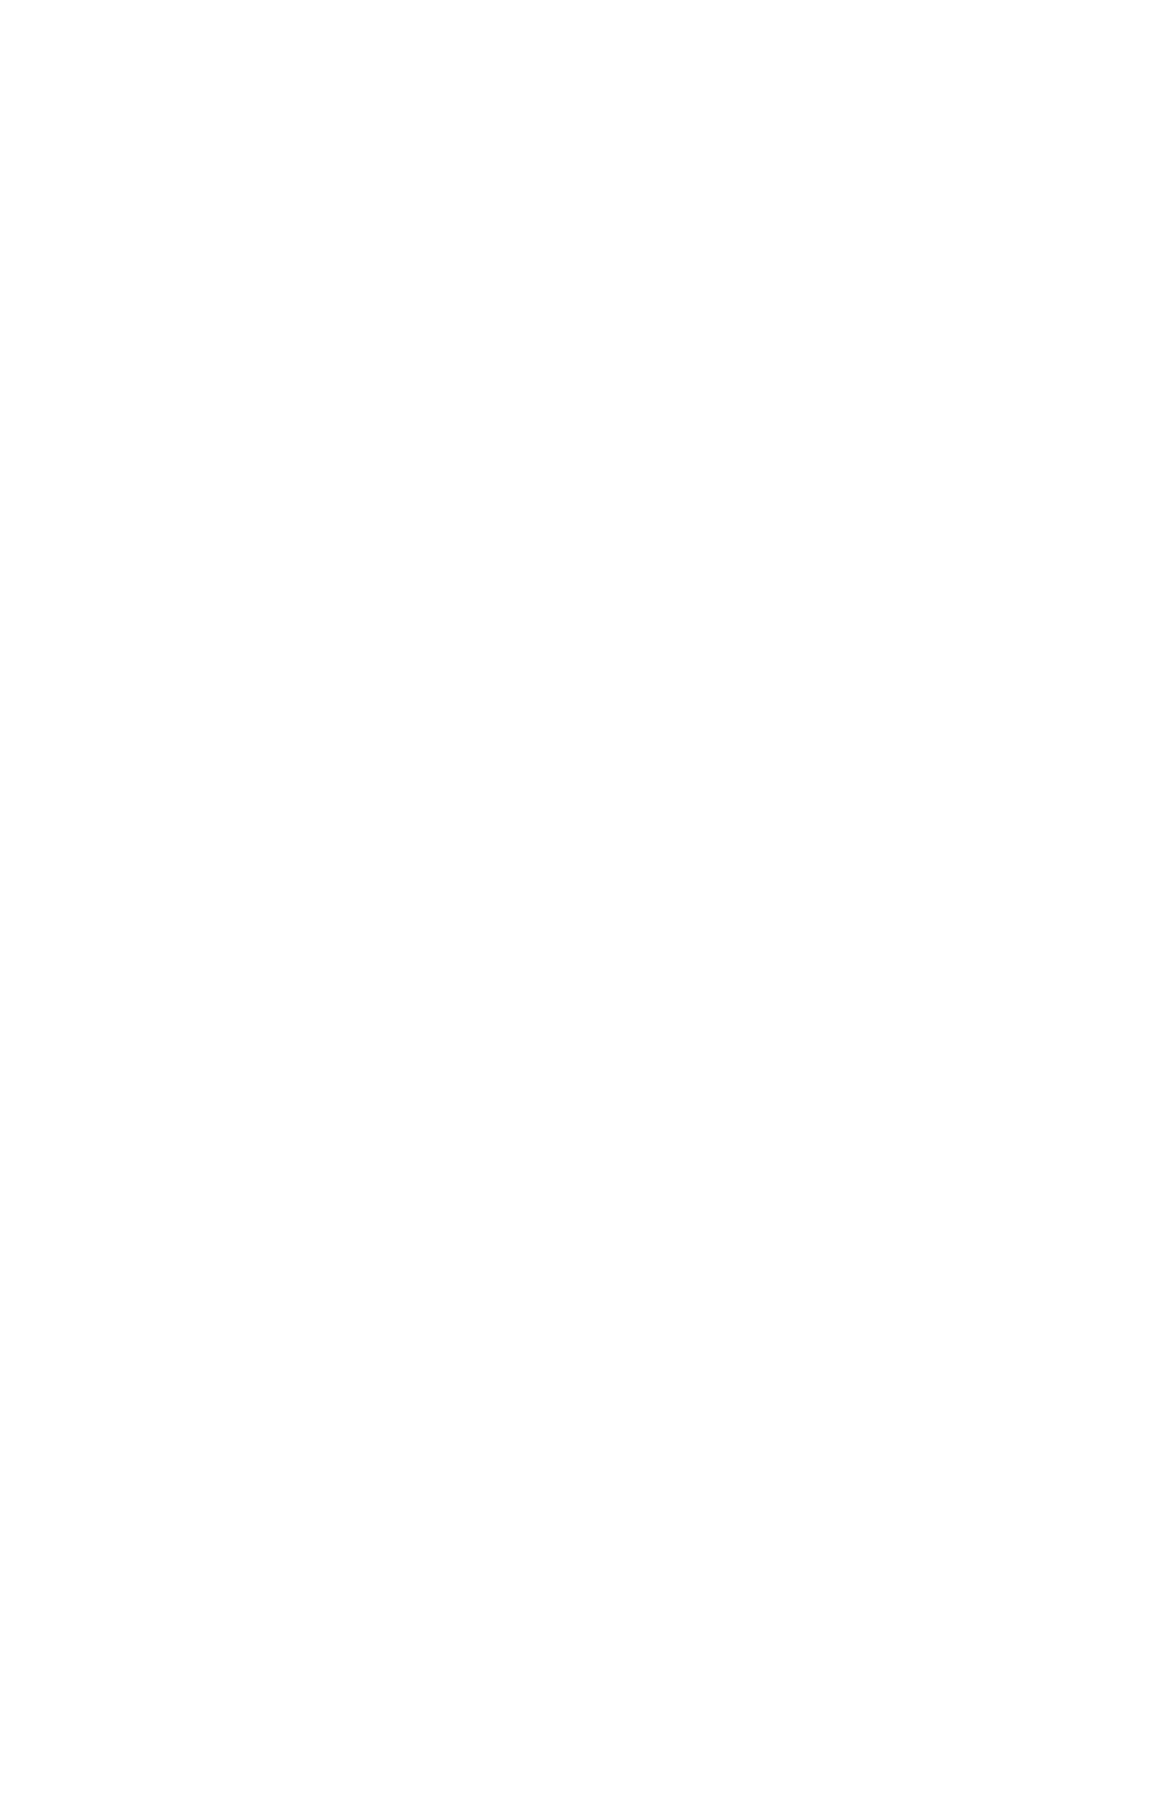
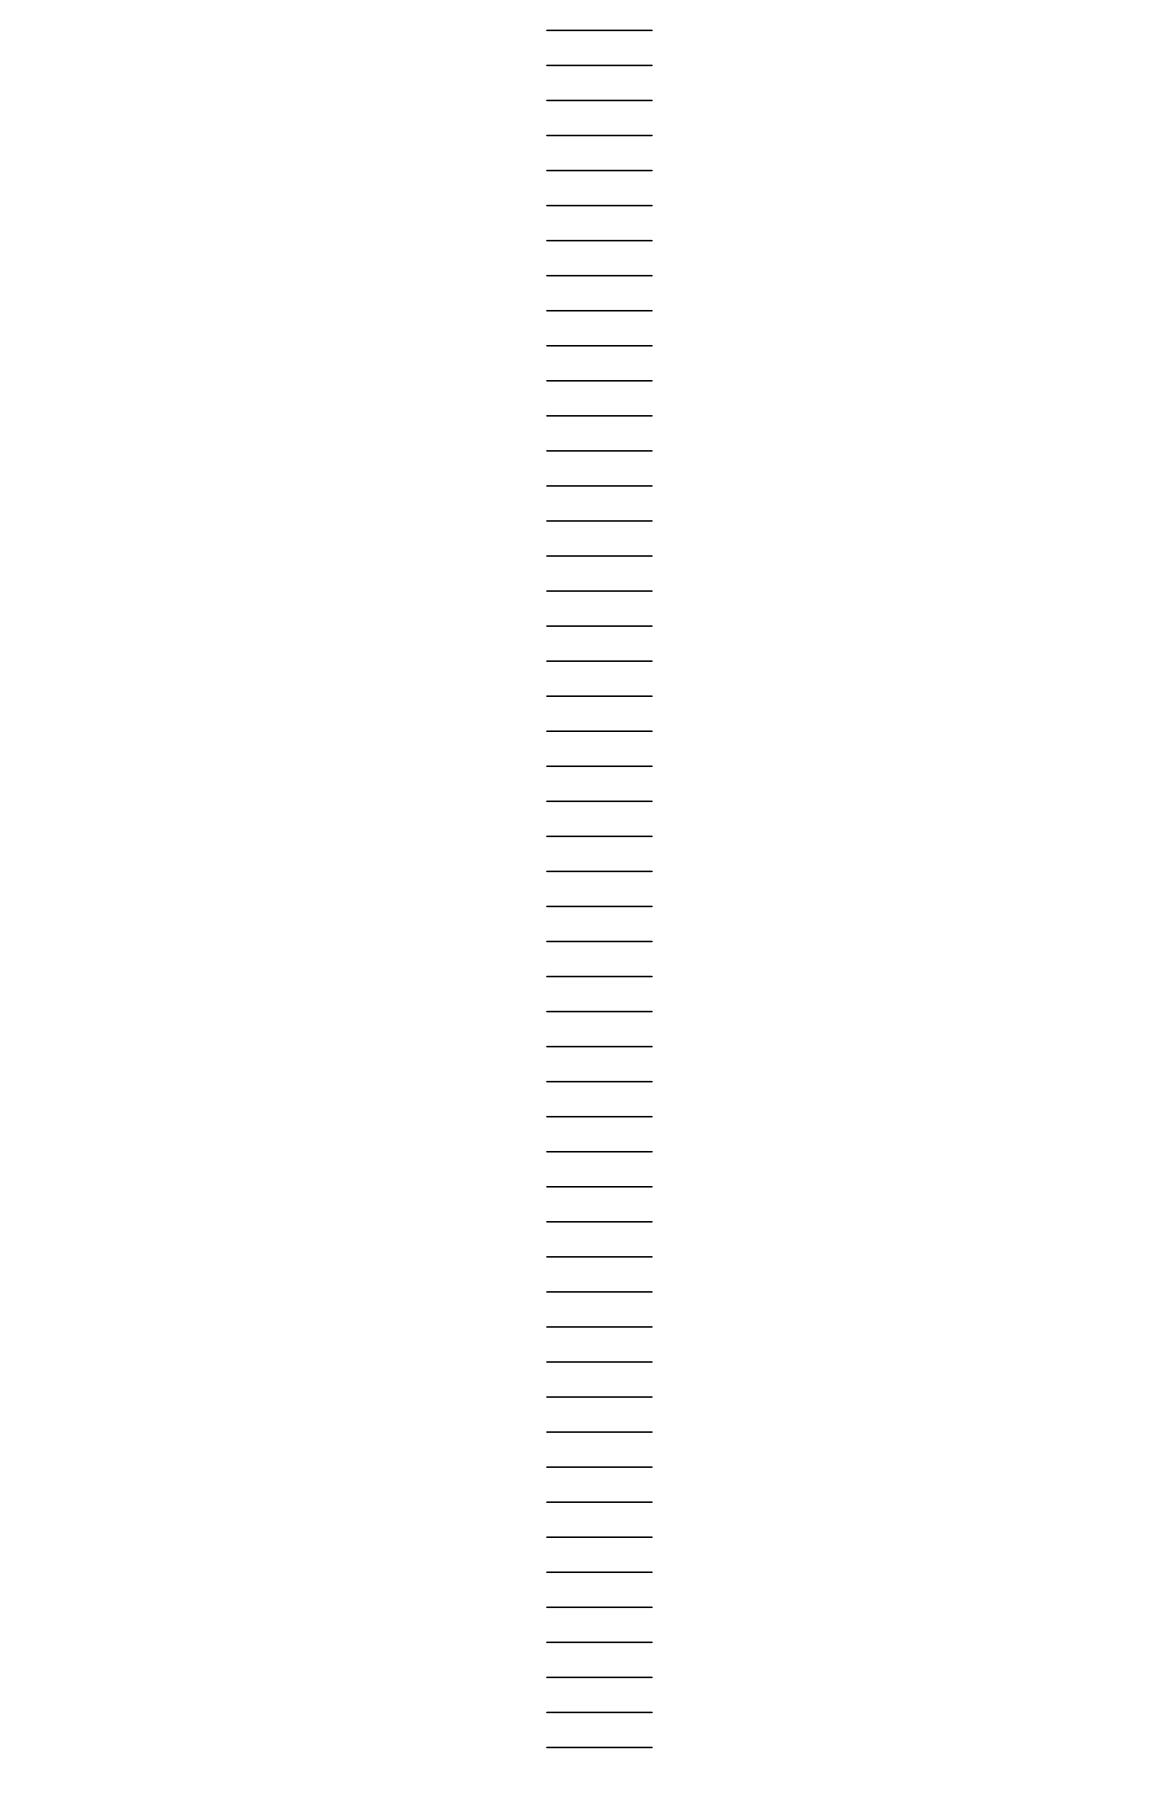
wire: none -> (546, 30) (652, 30)
wire: none -> (546, 65) (652, 65)
wire: none -> (546, 100) (652, 100)
wire: none -> (546, 135) (652, 135)
wire: none -> (546, 170) (652, 170)
wire: none -> (546, 205) (652, 205)
wire: none -> (546, 240) (652, 240)
wire: none -> (546, 275) (652, 275)
wire: none -> (546, 310) (652, 310)
wire: none -> (546, 345) (652, 345)
wire: none -> (546, 380) (652, 380)
wire: none -> (546, 415) (652, 415)
wire: none -> (546, 450) (652, 450)
wire: none -> (546, 485) (652, 485)
wire: none -> (546, 520) (652, 520)
wire: none -> (546, 556) (652, 556)
wire: none -> (546, 591) (652, 591)
wire: none -> (546, 626) (652, 626)
wire: none -> (546, 661) (652, 661)
wire: none -> (546, 696) (652, 696)
wire: none -> (546, 731) (652, 731)
wire: none -> (546, 766) (652, 766)
wire: none -> (546, 801) (652, 801)
wire: none -> (546, 836) (652, 836)
wire: none -> (546, 871) (652, 871)
wire: none -> (546, 906) (652, 906)
wire: none -> (546, 941) (652, 941)
wire: none -> (546, 976) (652, 976)
wire: none -> (546, 1011) (652, 1011)
wire: none -> (546, 1046) (652, 1046)
wire: none -> (546, 1081) (652, 1081)
wire: none -> (546, 1116) (652, 1116)
wire: none -> (546, 1151) (652, 1151)
wire: none -> (546, 1186) (652, 1186)
wire: none -> (546, 1221) (652, 1221)
wire: none -> (546, 1256) (652, 1256)
wire: none -> (546, 1291) (652, 1291)
wire: none -> (546, 1326) (652, 1326)
wire: none -> (546, 1361) (652, 1361)
wire: none -> (546, 1397) (652, 1397)
wire: none -> (546, 1432) (652, 1432)
wire: none -> (546, 1467) (652, 1467)
wire: none -> (546, 1502) (652, 1502)
wire: none -> (546, 1537) (652, 1537)
wire: none -> (546, 1572) (652, 1572)
wire: none -> (546, 1607) (652, 1607)
wire: none -> (546, 1642) (652, 1642)
wire: none -> (546, 1677) (652, 1677)
wire: none -> (546, 1712) (652, 1712)
wire: none -> (546, 1747) (652, 1747)

